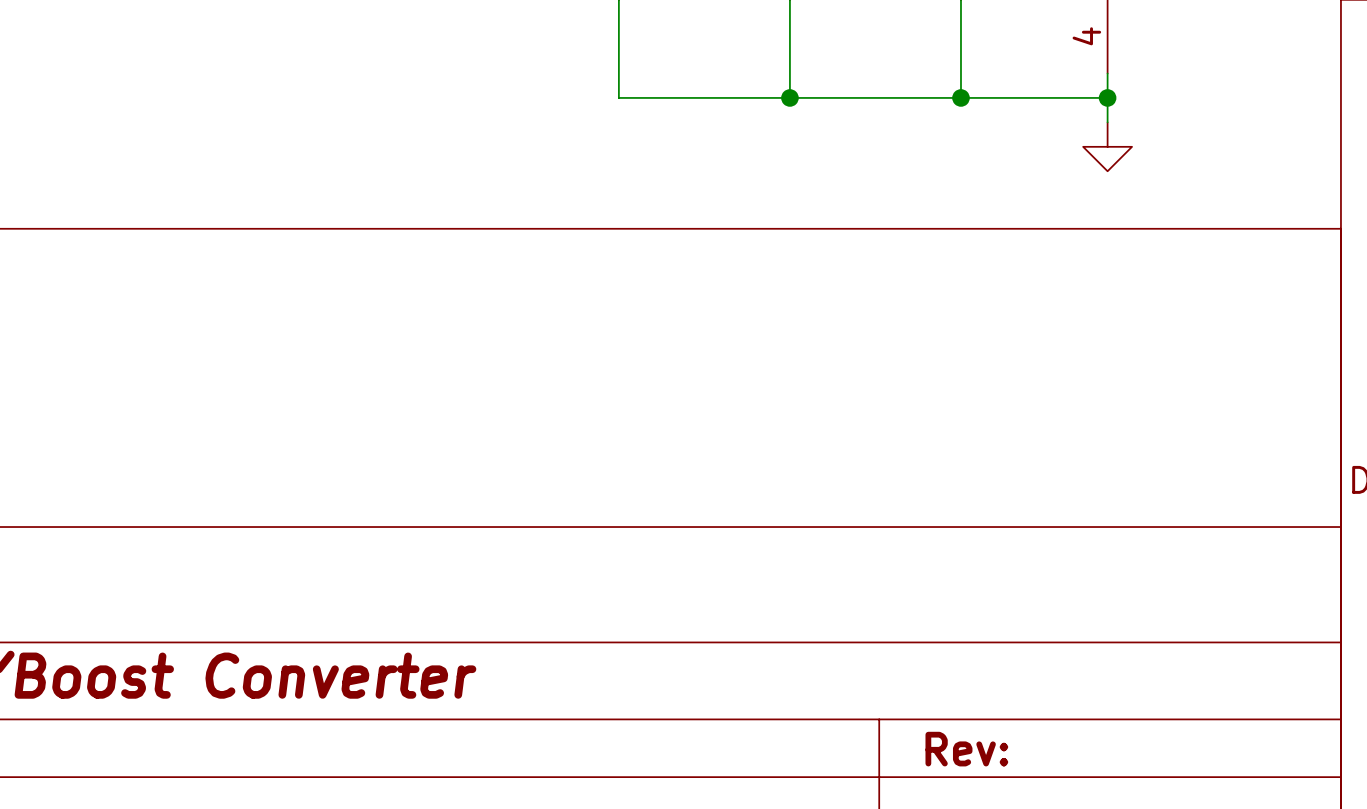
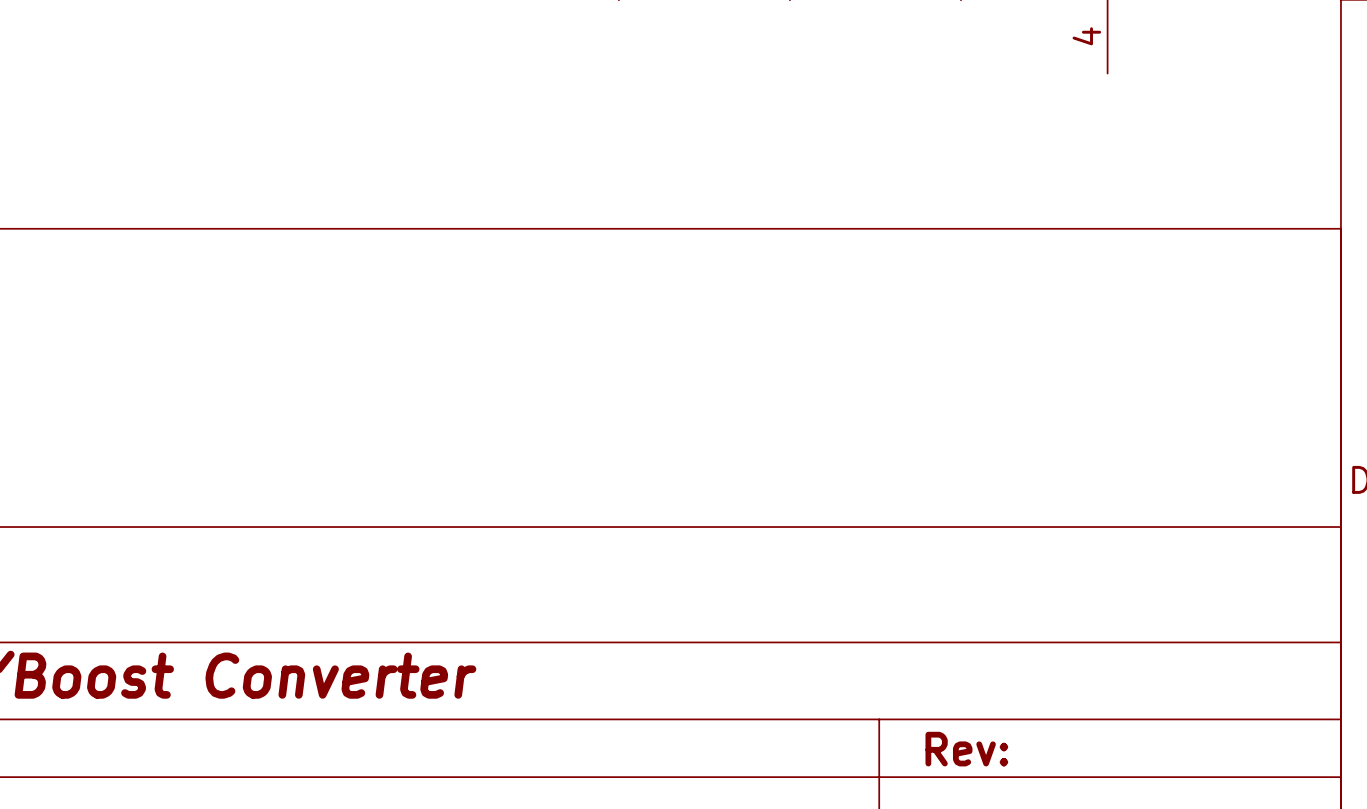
wire: (618, 0) (618, 97) (1107, 97) -> none
wire: (789, 0) (789, 97) -> none
wire: (960, 0) (960, 97) -> none
wire: (1107, 73) (1107, 122) -> none
junction: (789, 97) -> none
junction: (960, 97) -> none
junction: (1107, 97) -> none
power symbol: (1107, 146) -> none

